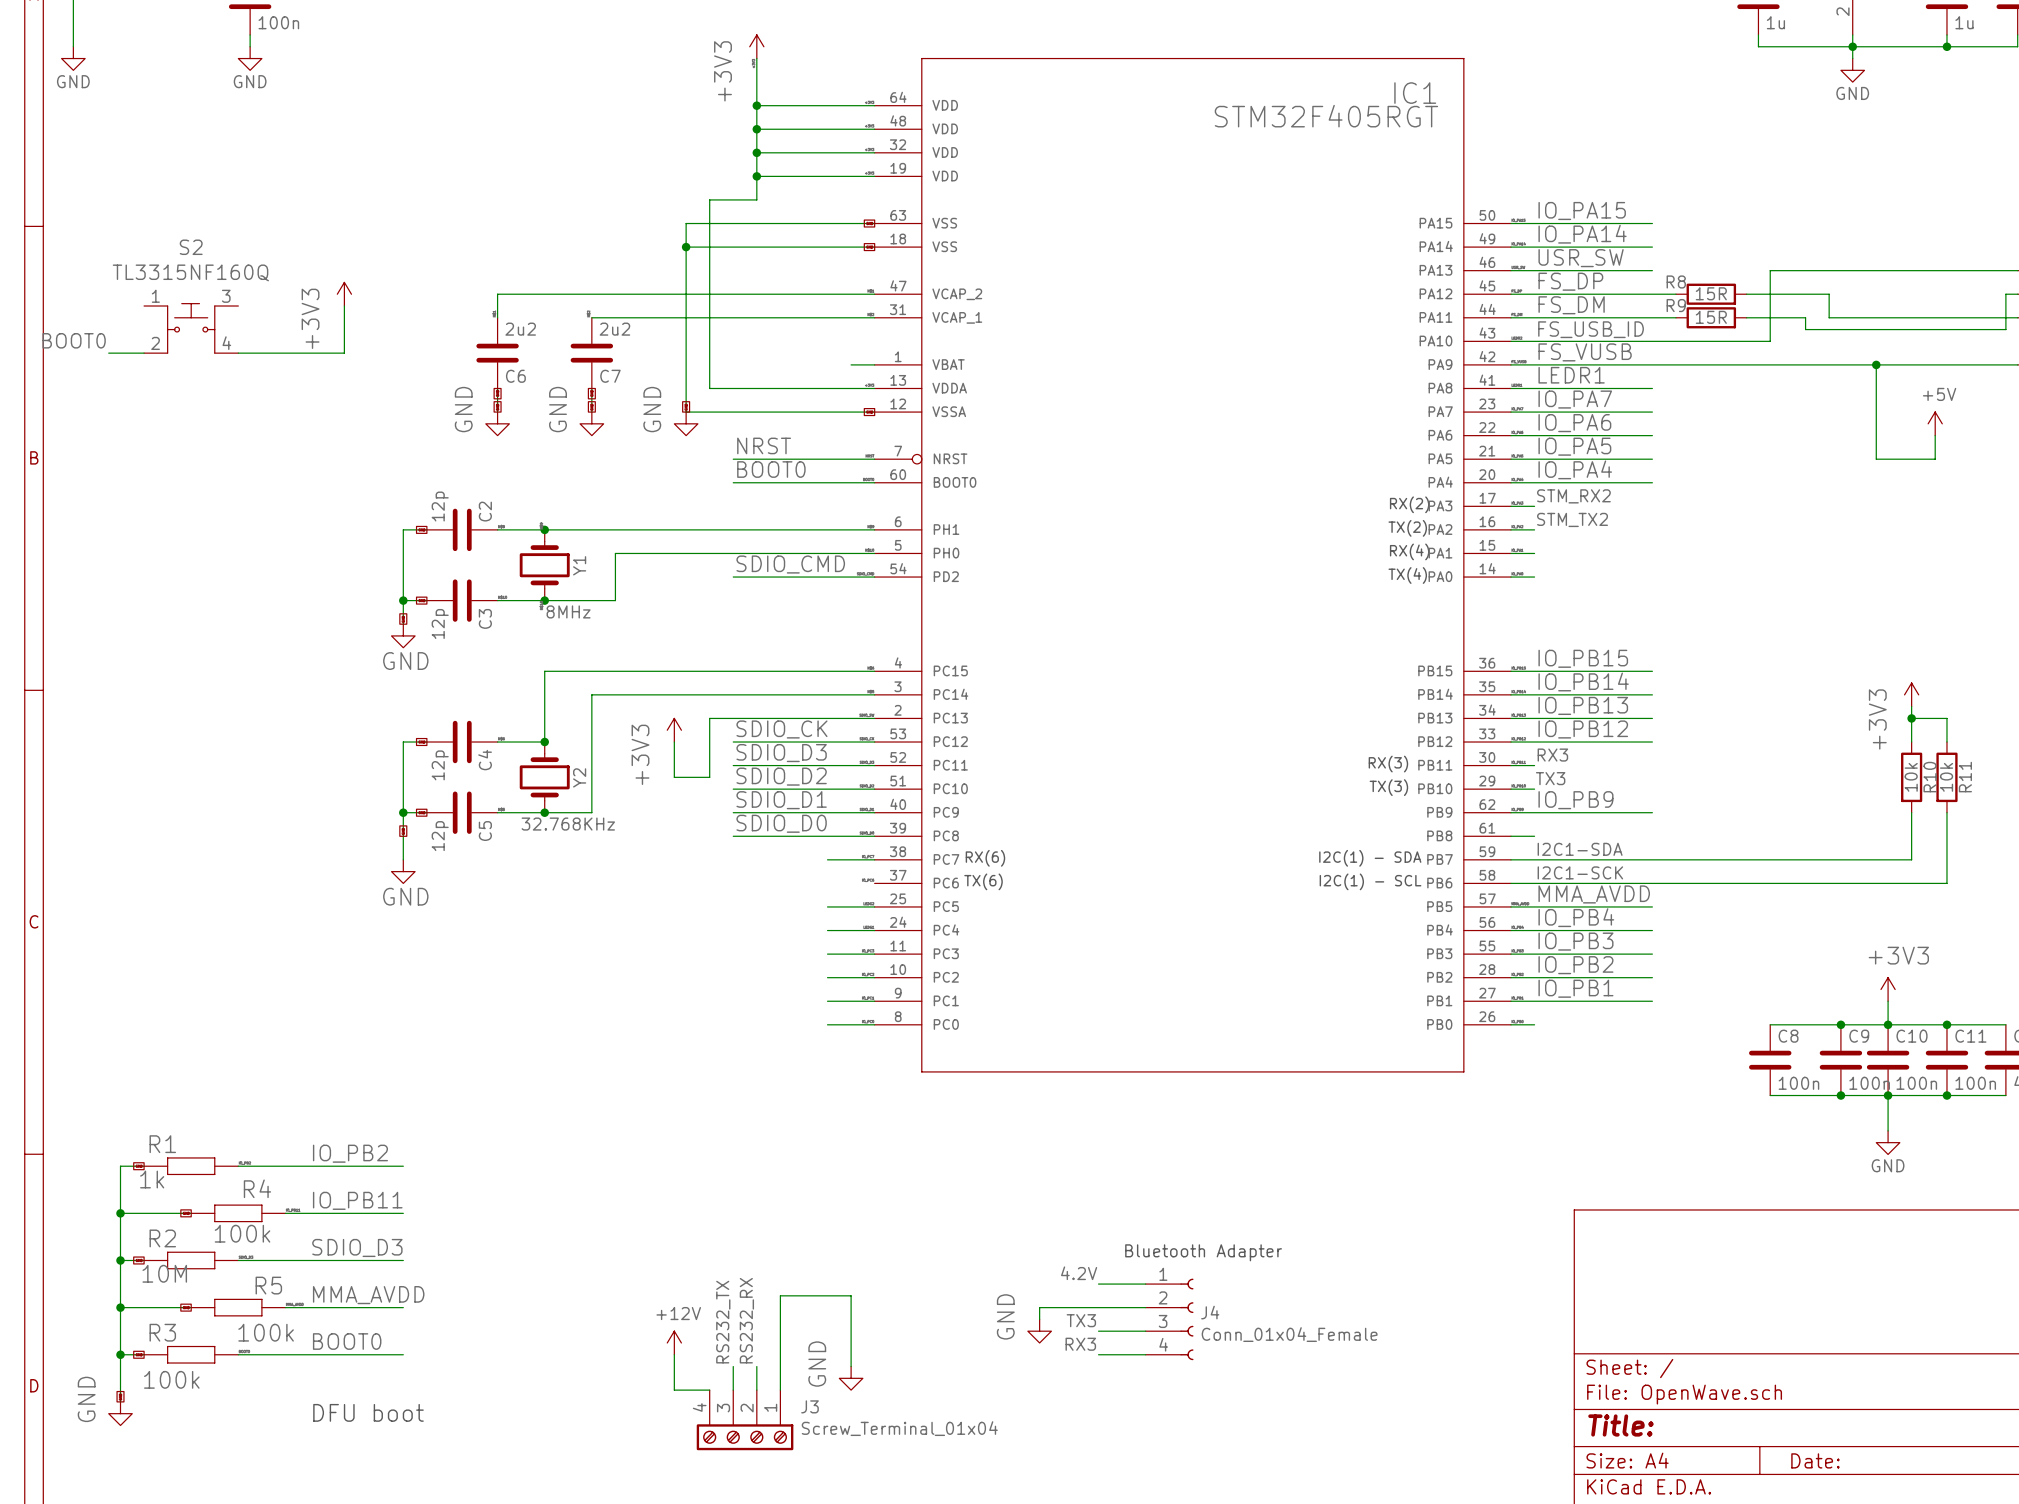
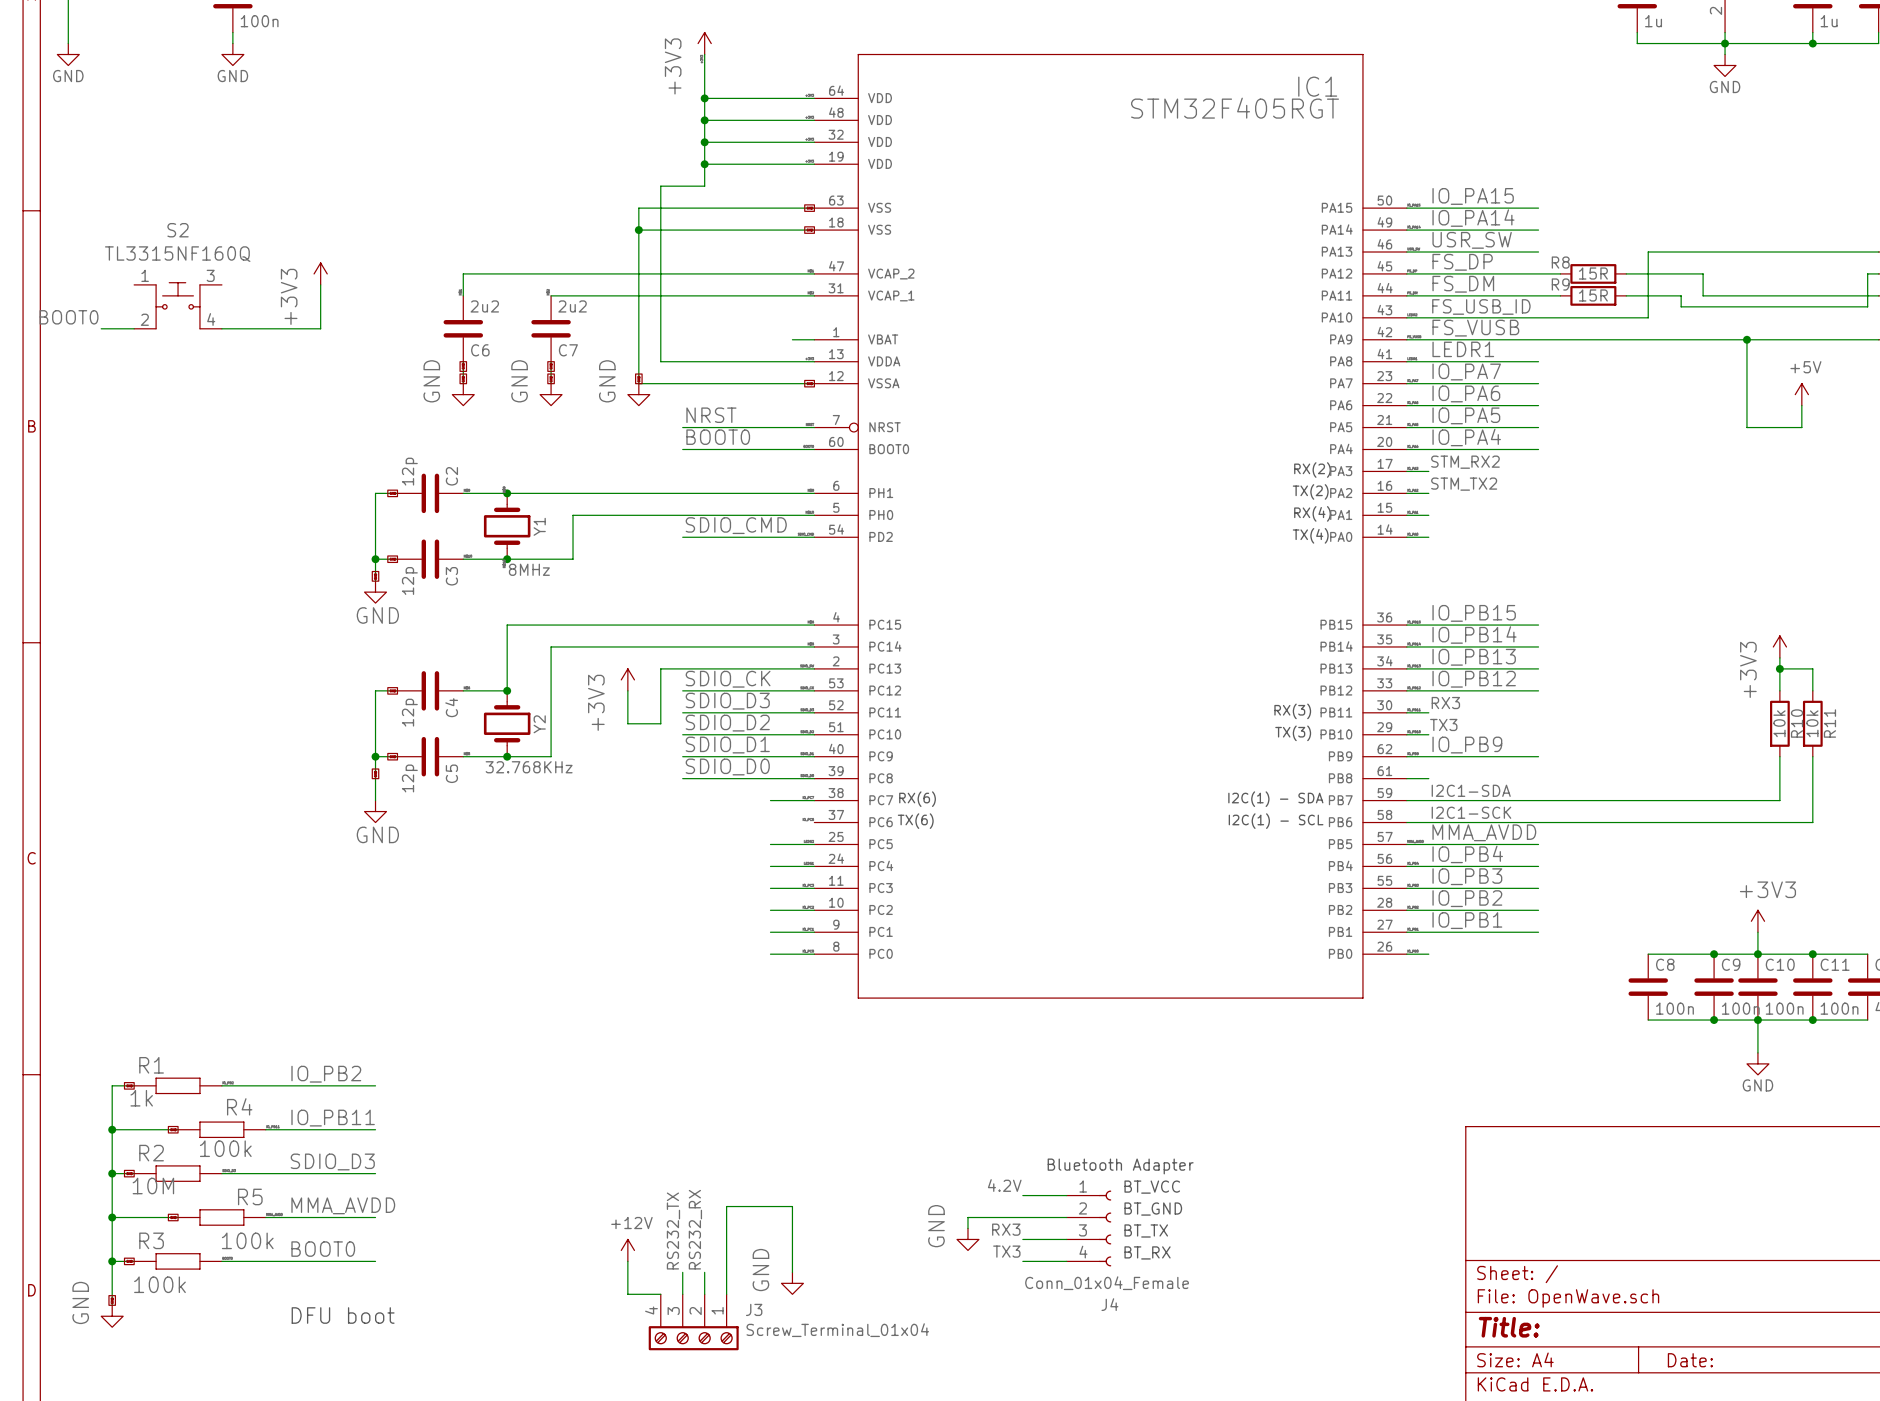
text: none -> BT_VCC (1152, 1187)
text: none -> BT_GND (1153, 1209)
J4 name position: J4 (1210, 1312) -> J4 (1109, 1304)
label: TX3 (1081, 1320) -> RX3 (1006, 1229)
text: none -> BT_TX (1146, 1230)
J4 value position: Conn_01x04_Female (1289, 1334) -> Conn_01x04_Female (1107, 1283)
label: RX3 (1080, 1344) -> TX3 (1006, 1251)
text: none -> BT_RX (1147, 1252)

